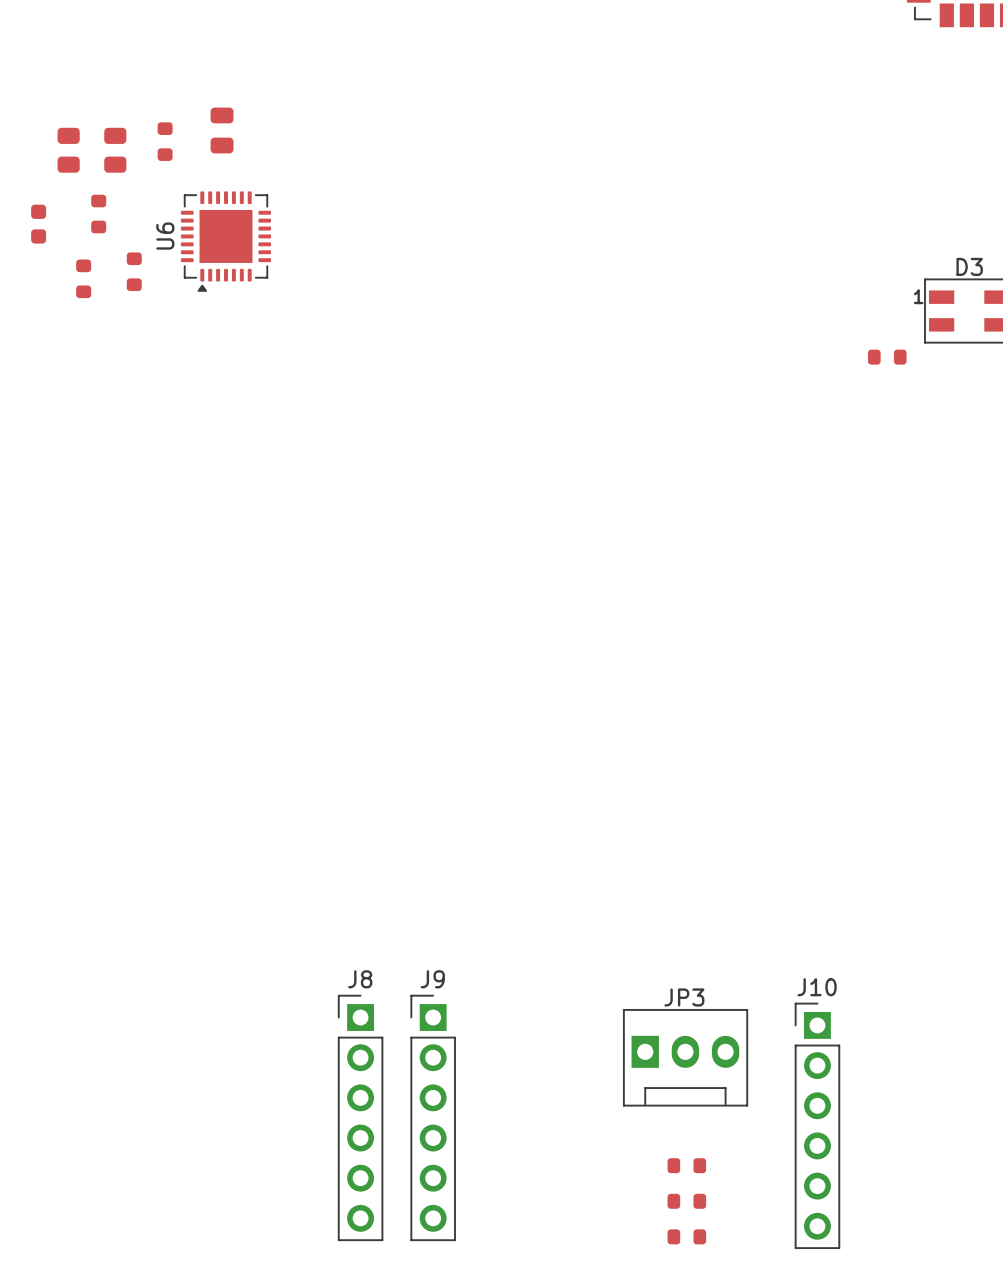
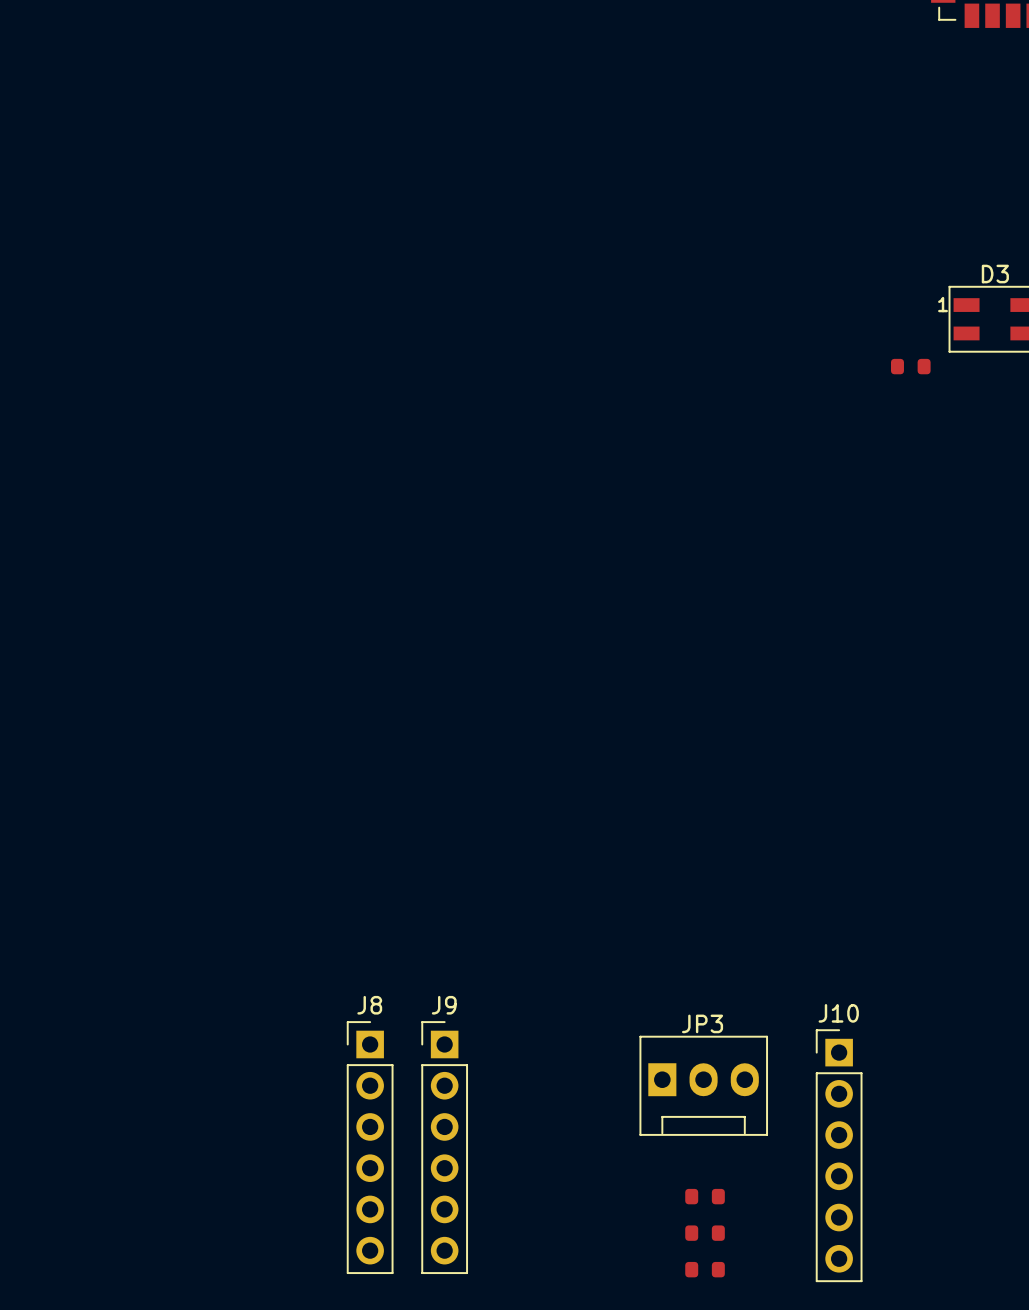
part: (222, 130) -> none
part: (165, 141) -> none
part: (68, 150) -> none
part: (115, 150) -> none
part: (98, 213) -> none
part: (38, 224) -> none
U6: (226, 241) -> none
part: (134, 271) -> none
part: (83, 278) -> none

